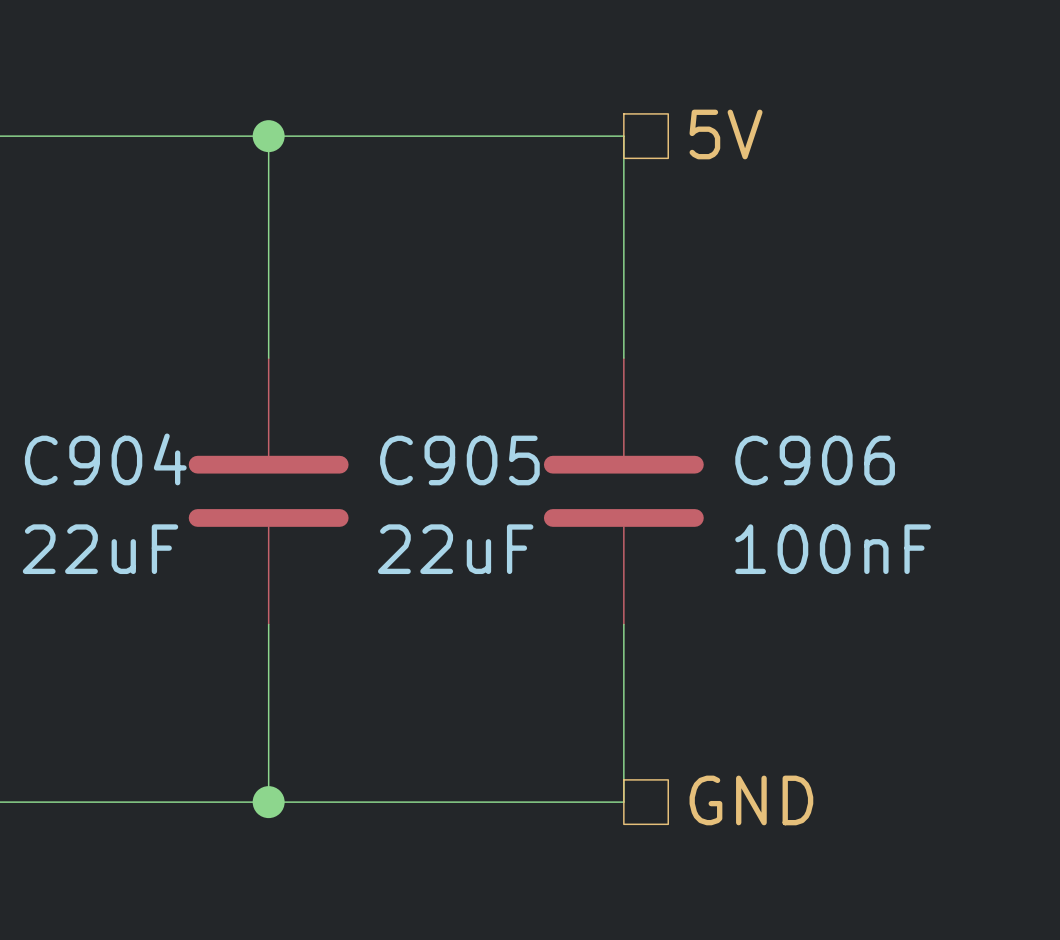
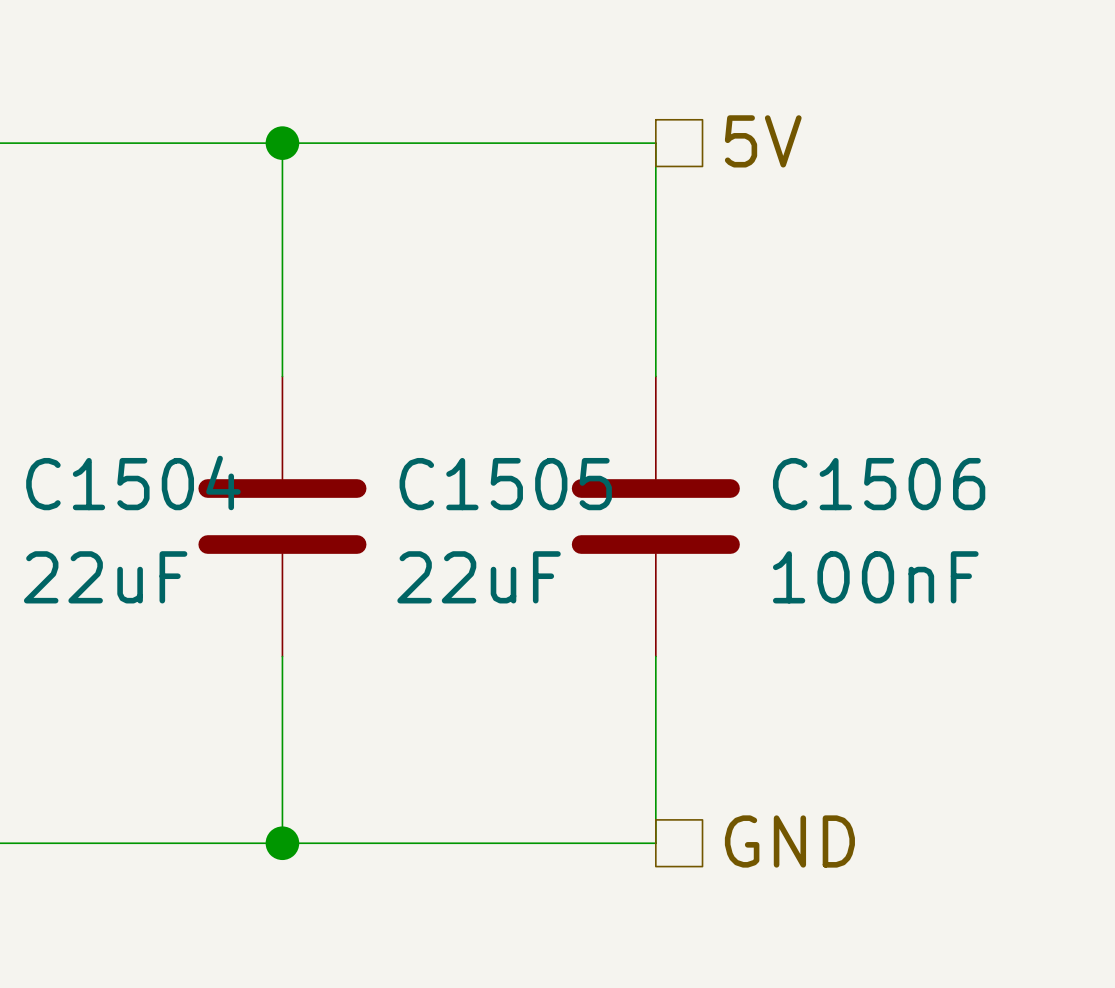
C904 name: C904 (105, 459) -> C1504 (133, 482)
C905 name: C905 (459, 460) -> C1505 (505, 484)
C906 name: C906 (815, 460) -> C1506 (879, 484)

